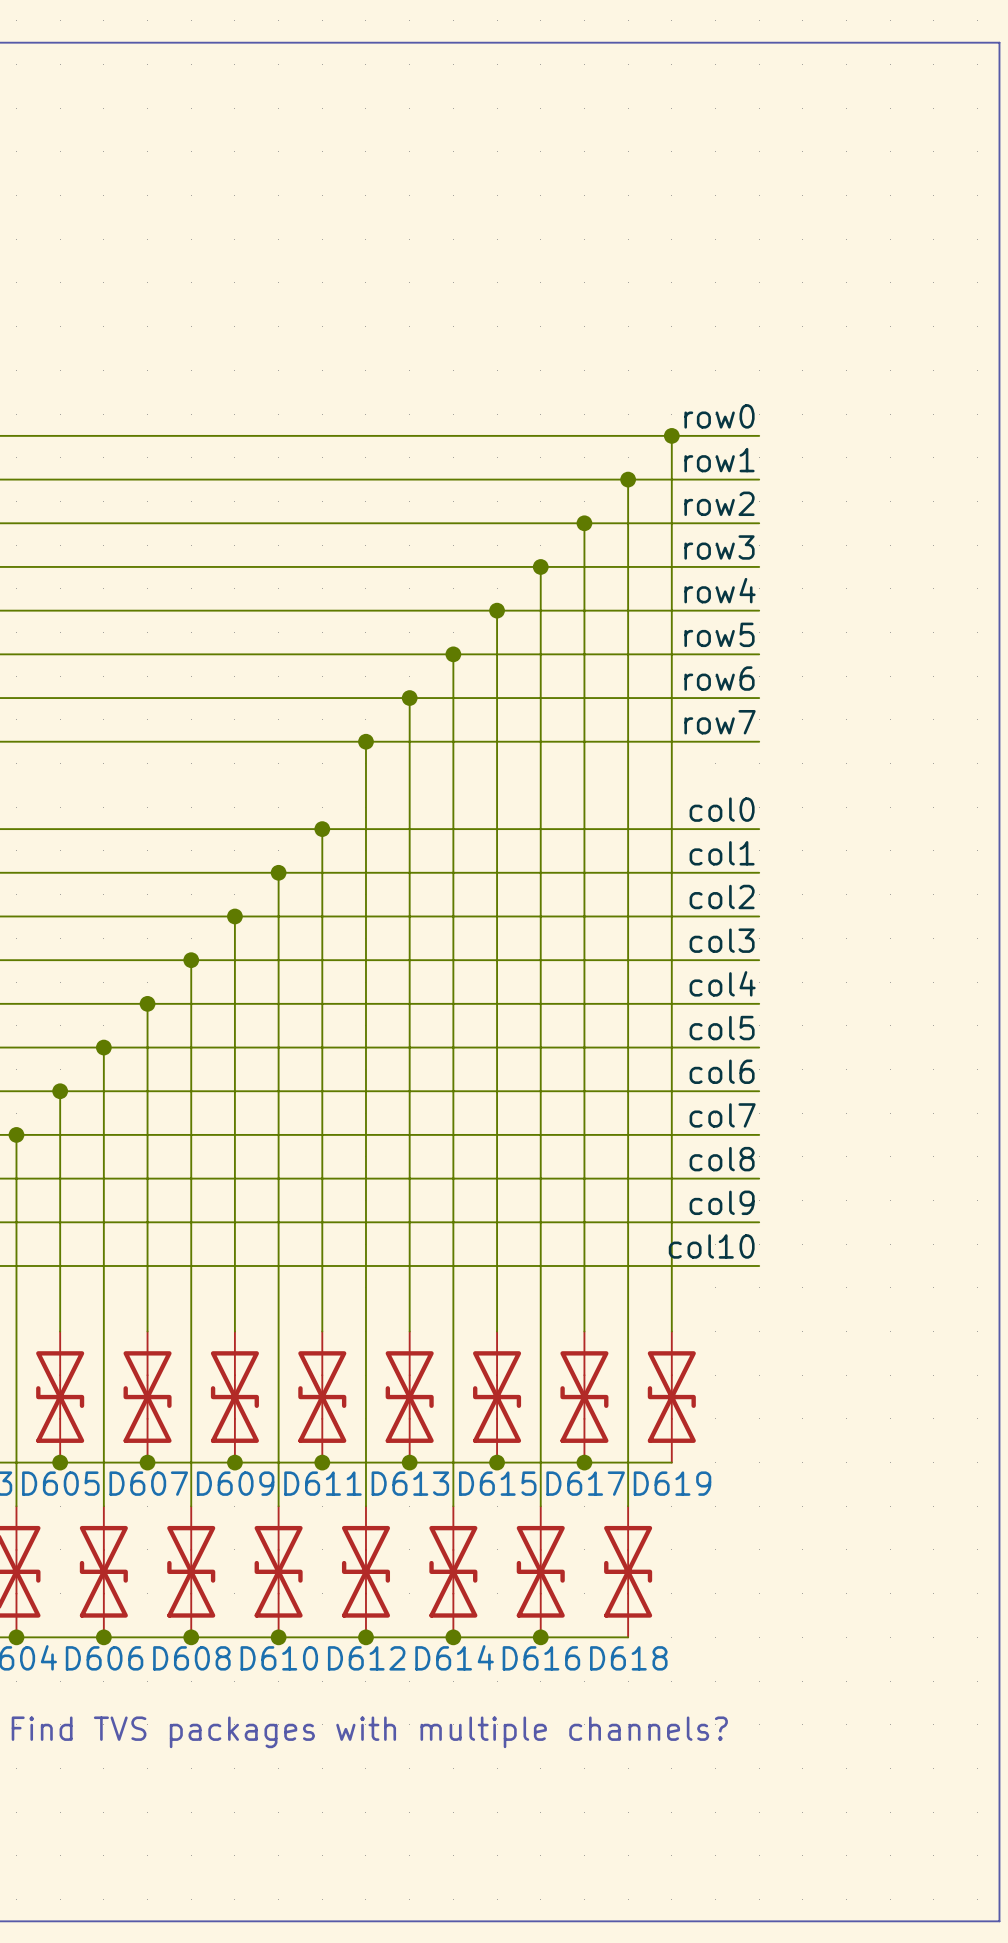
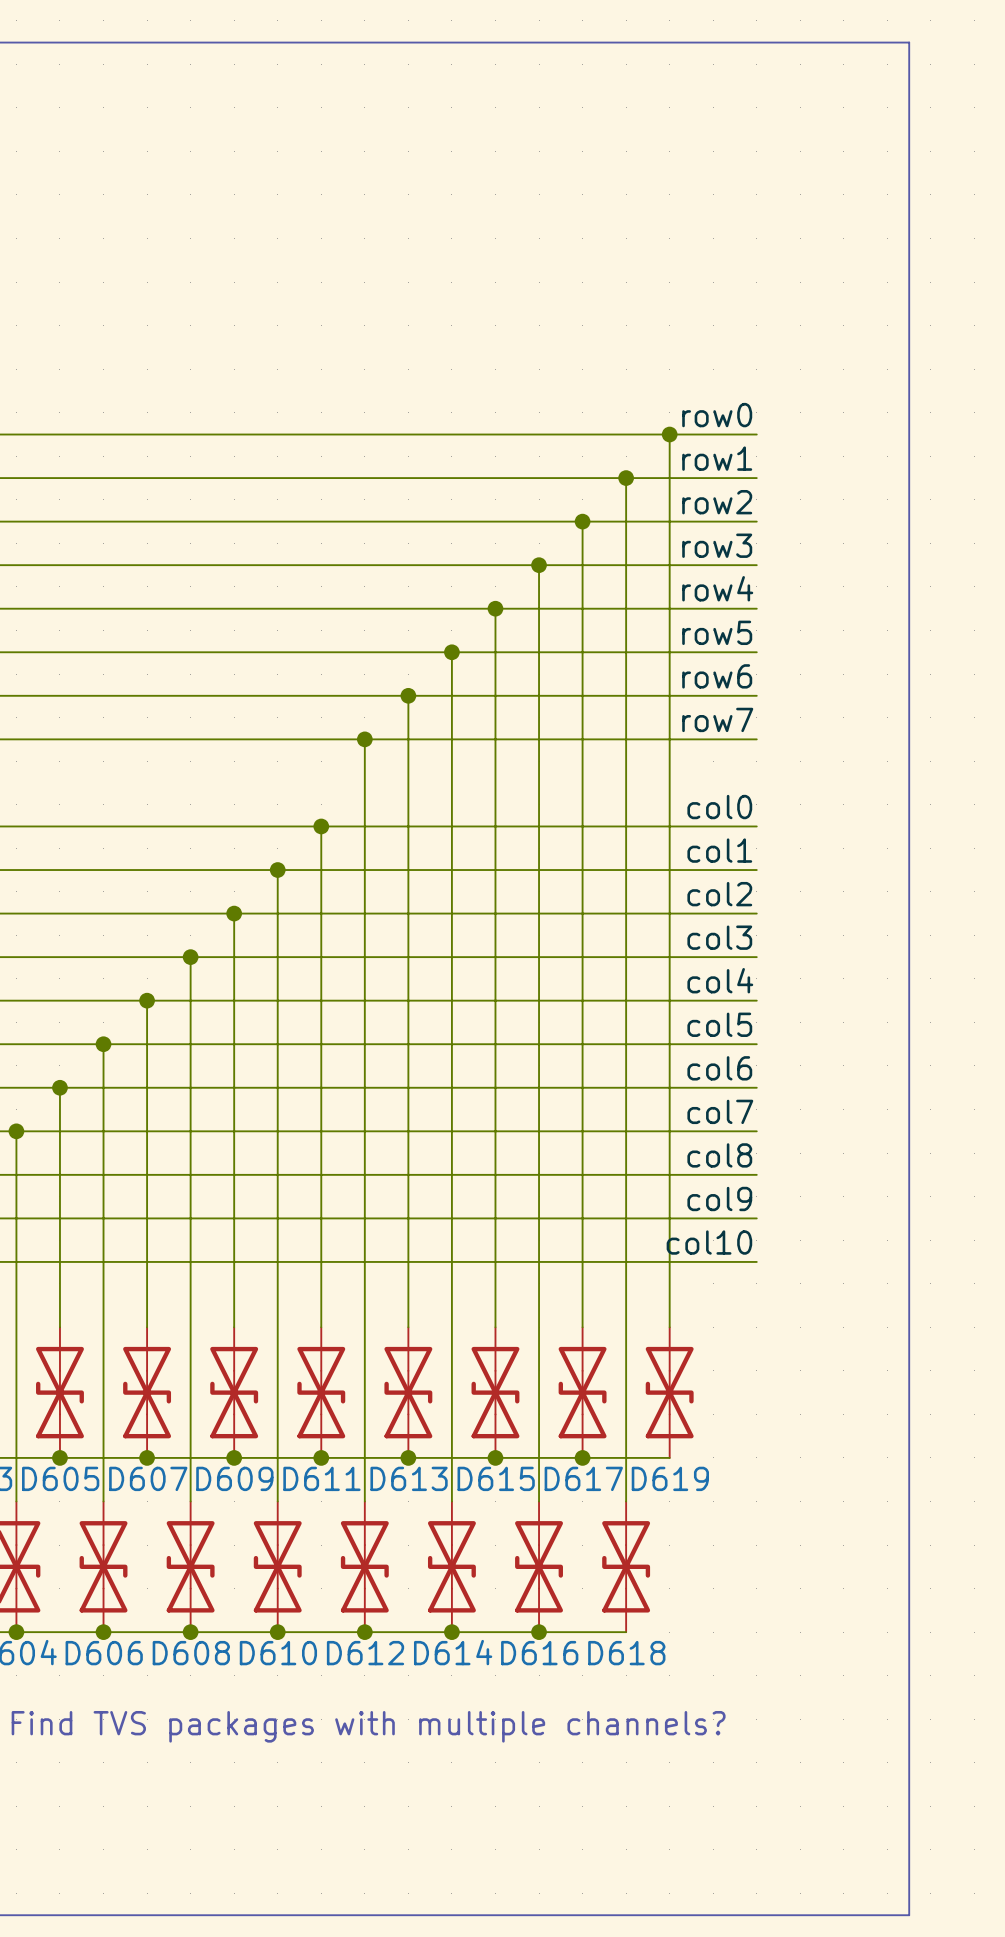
line: (912, 42) (999, 42) (999, 1921) (912, 1921) -> (909, 42) (909, 1915)

